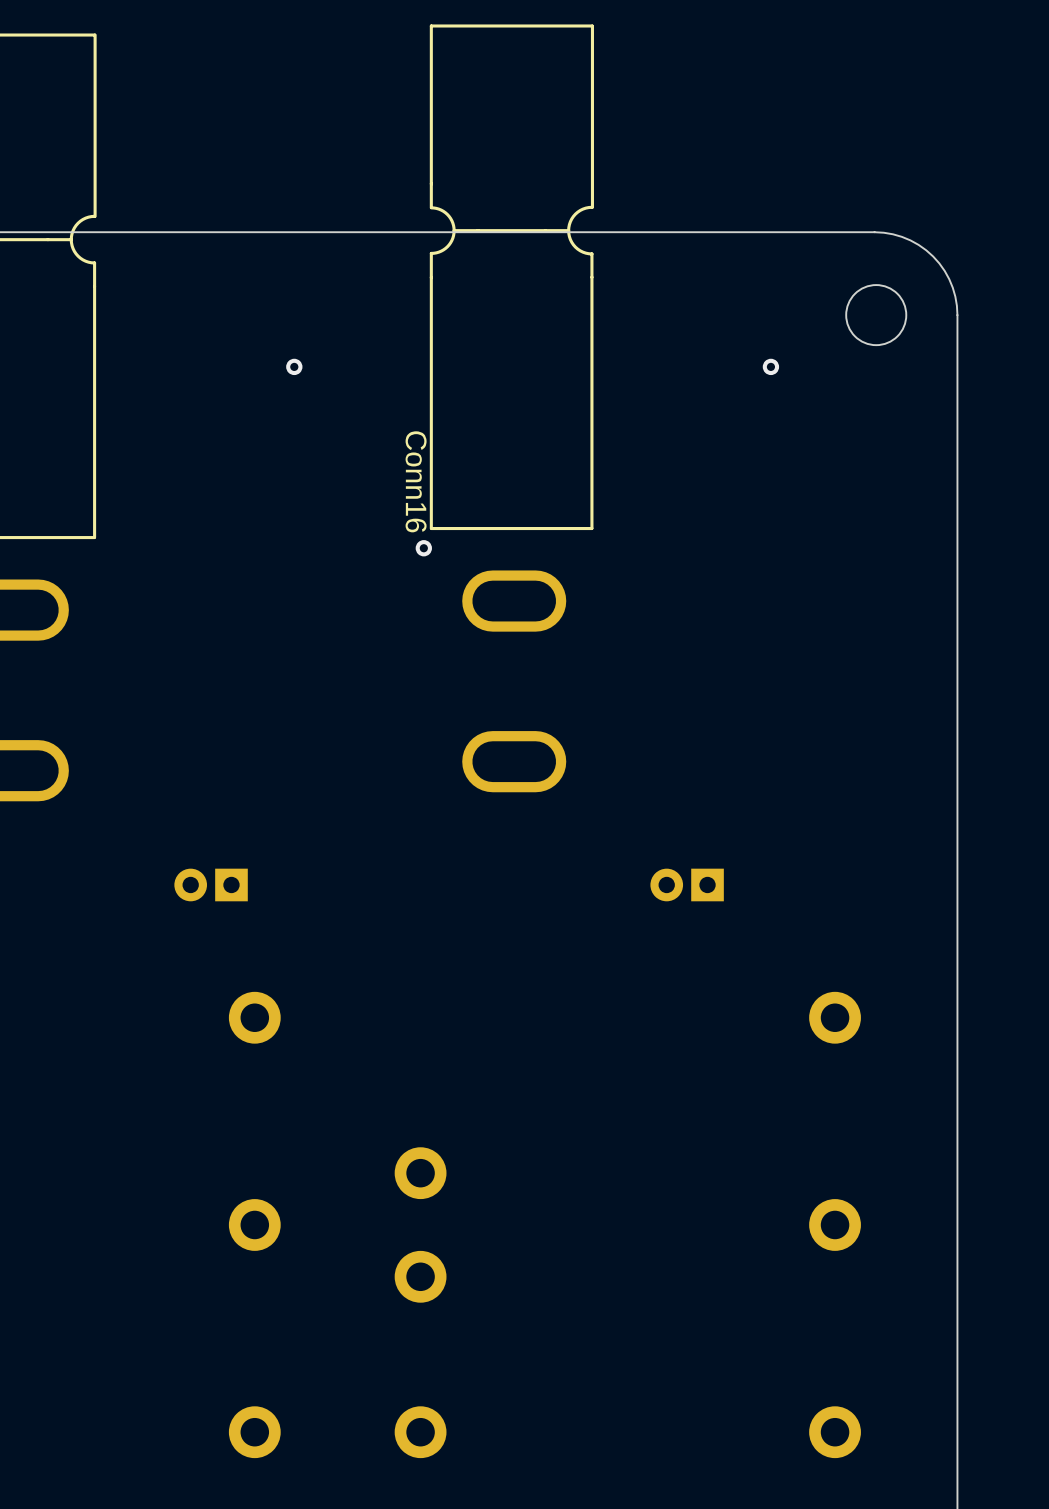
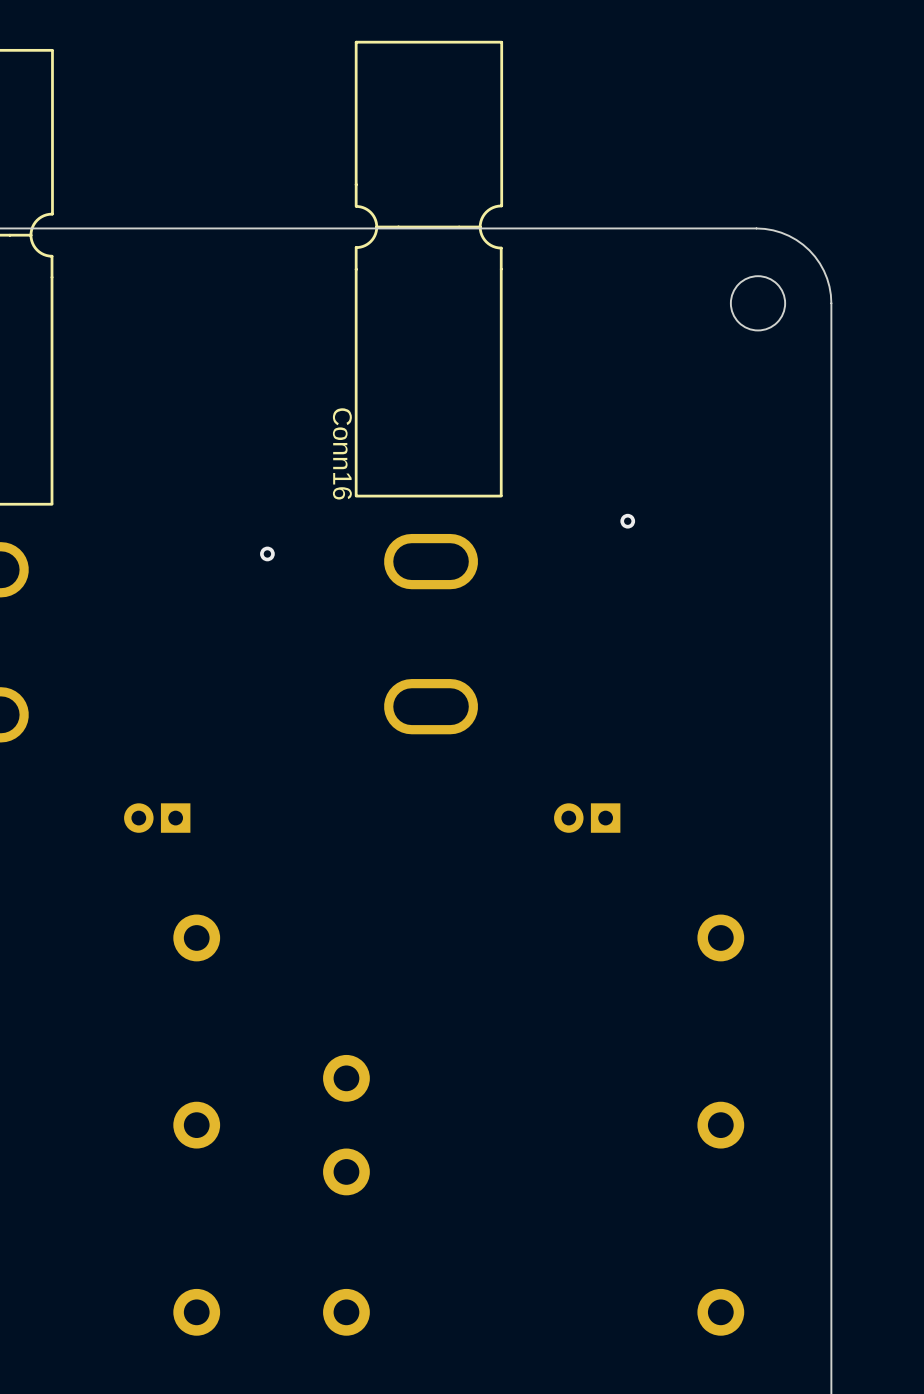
via: (294, 366) -> none
via: (770, 366) -> none
via position: (423, 548) -> (267, 553)
via: none -> (627, 521)

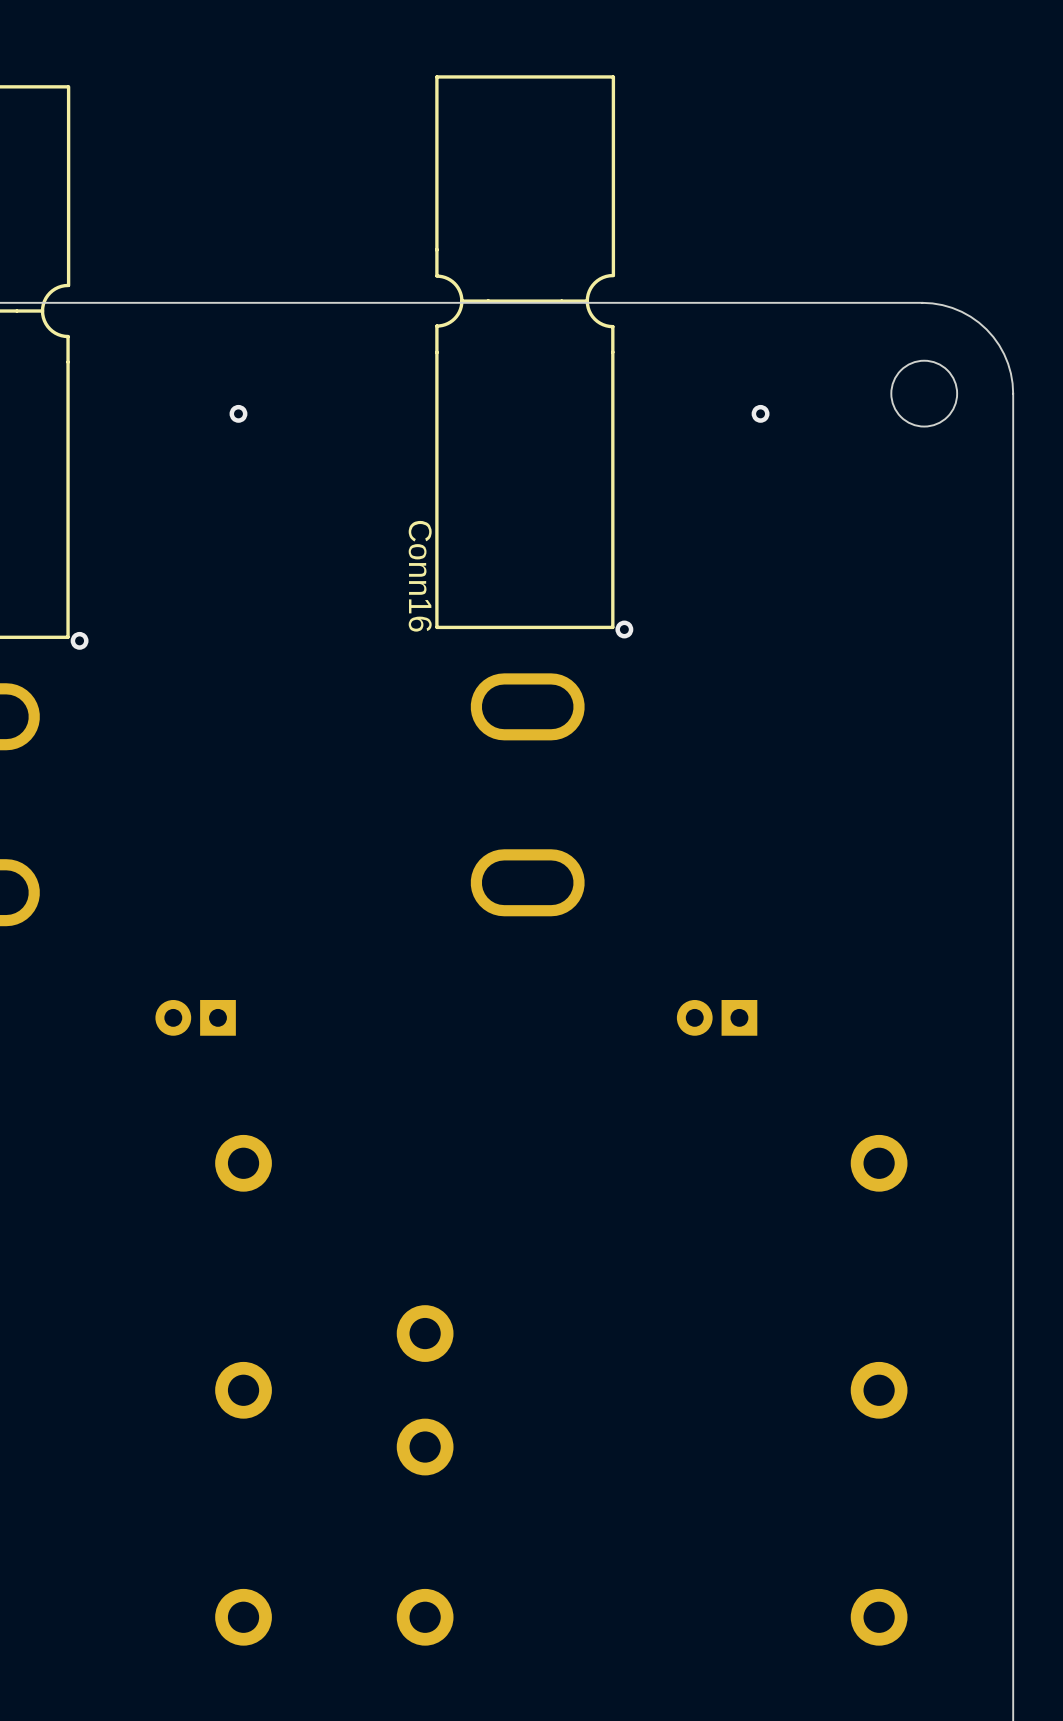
via: none -> (238, 413)
via: none -> (760, 413)
via: none -> (624, 629)
via: none -> (79, 640)
via: (627, 521) -> none
via: (267, 553) -> none

